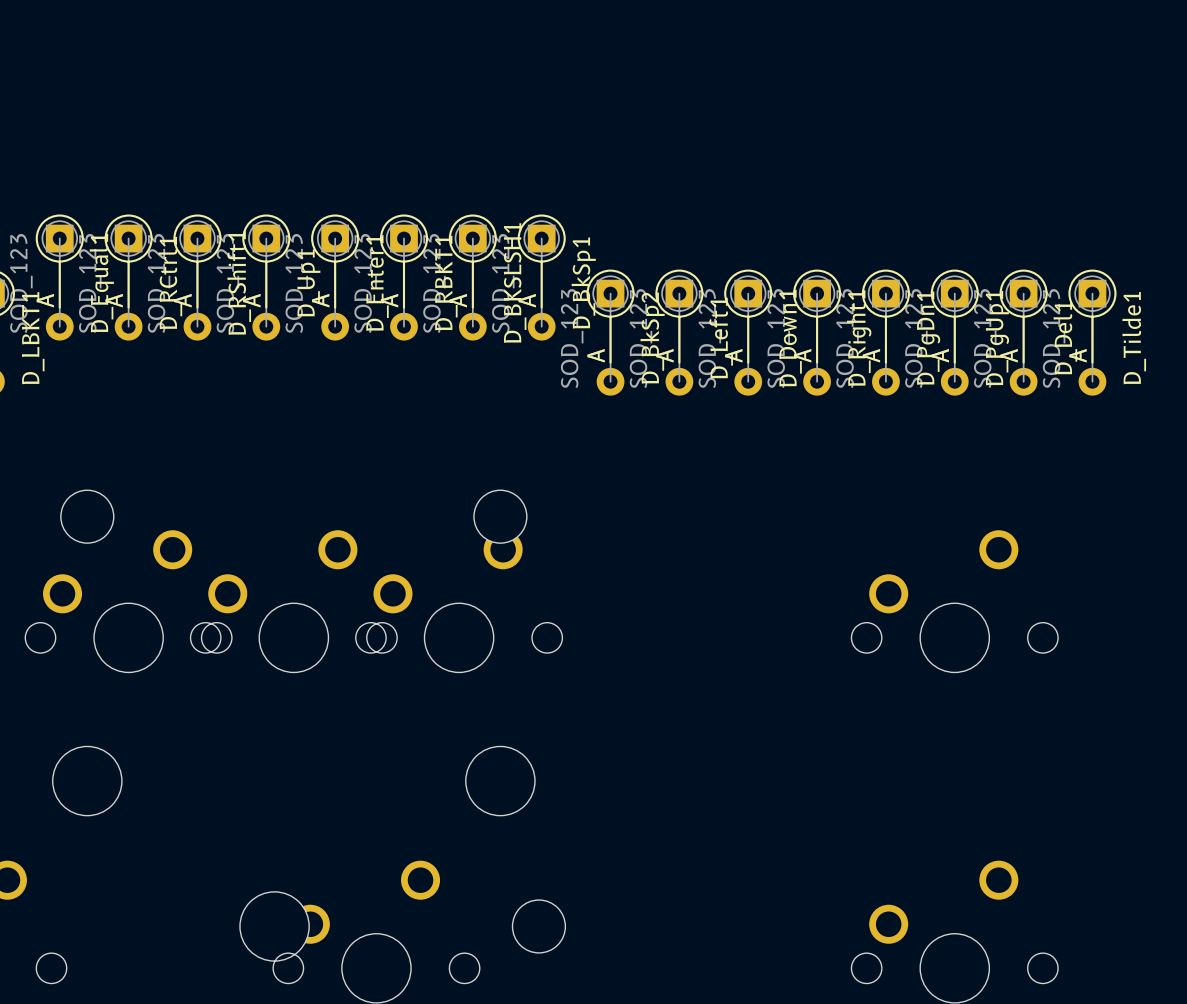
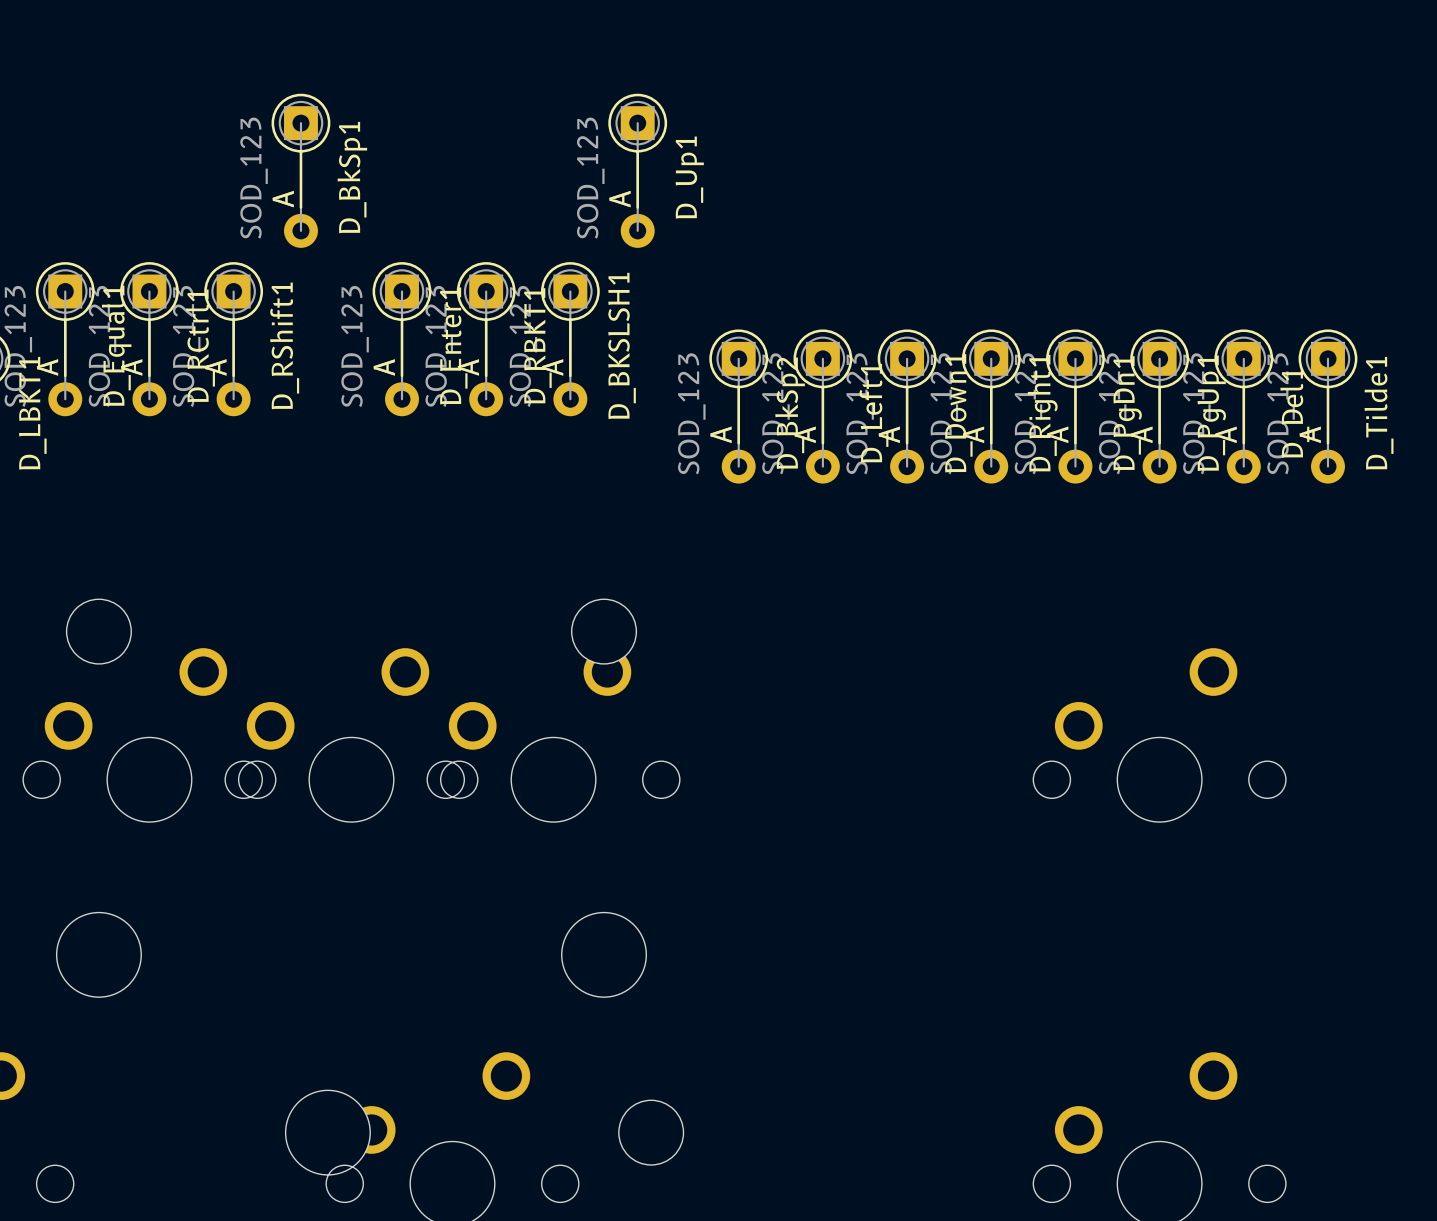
D_Up1 position: (266, 277) -> (637, 170)
D_BkSp1 position: (541, 277) -> (300, 170)

